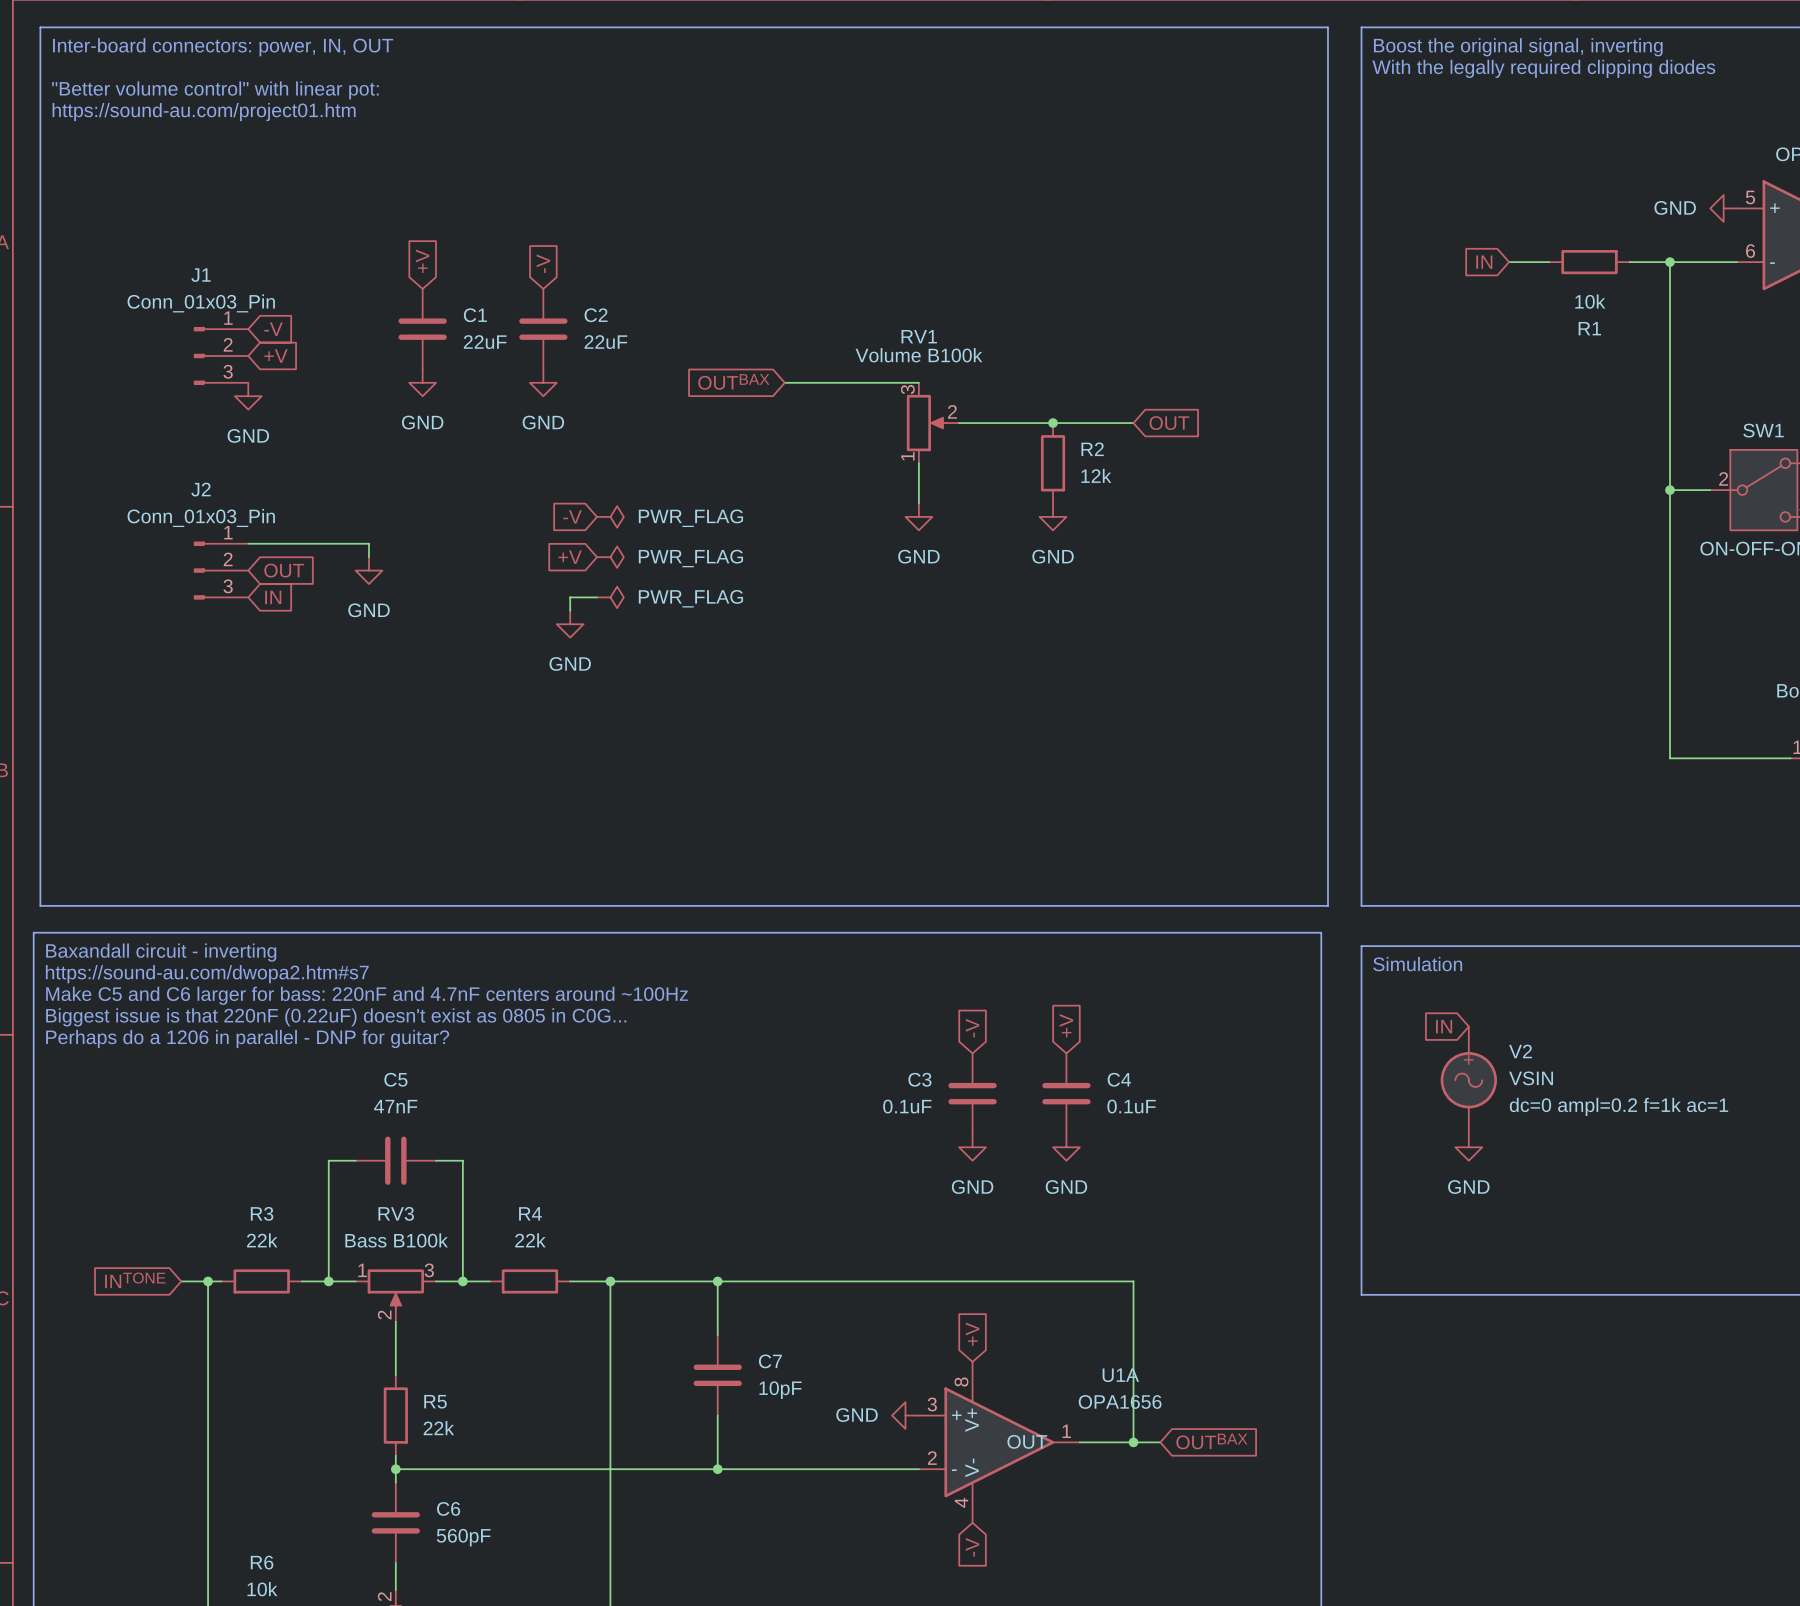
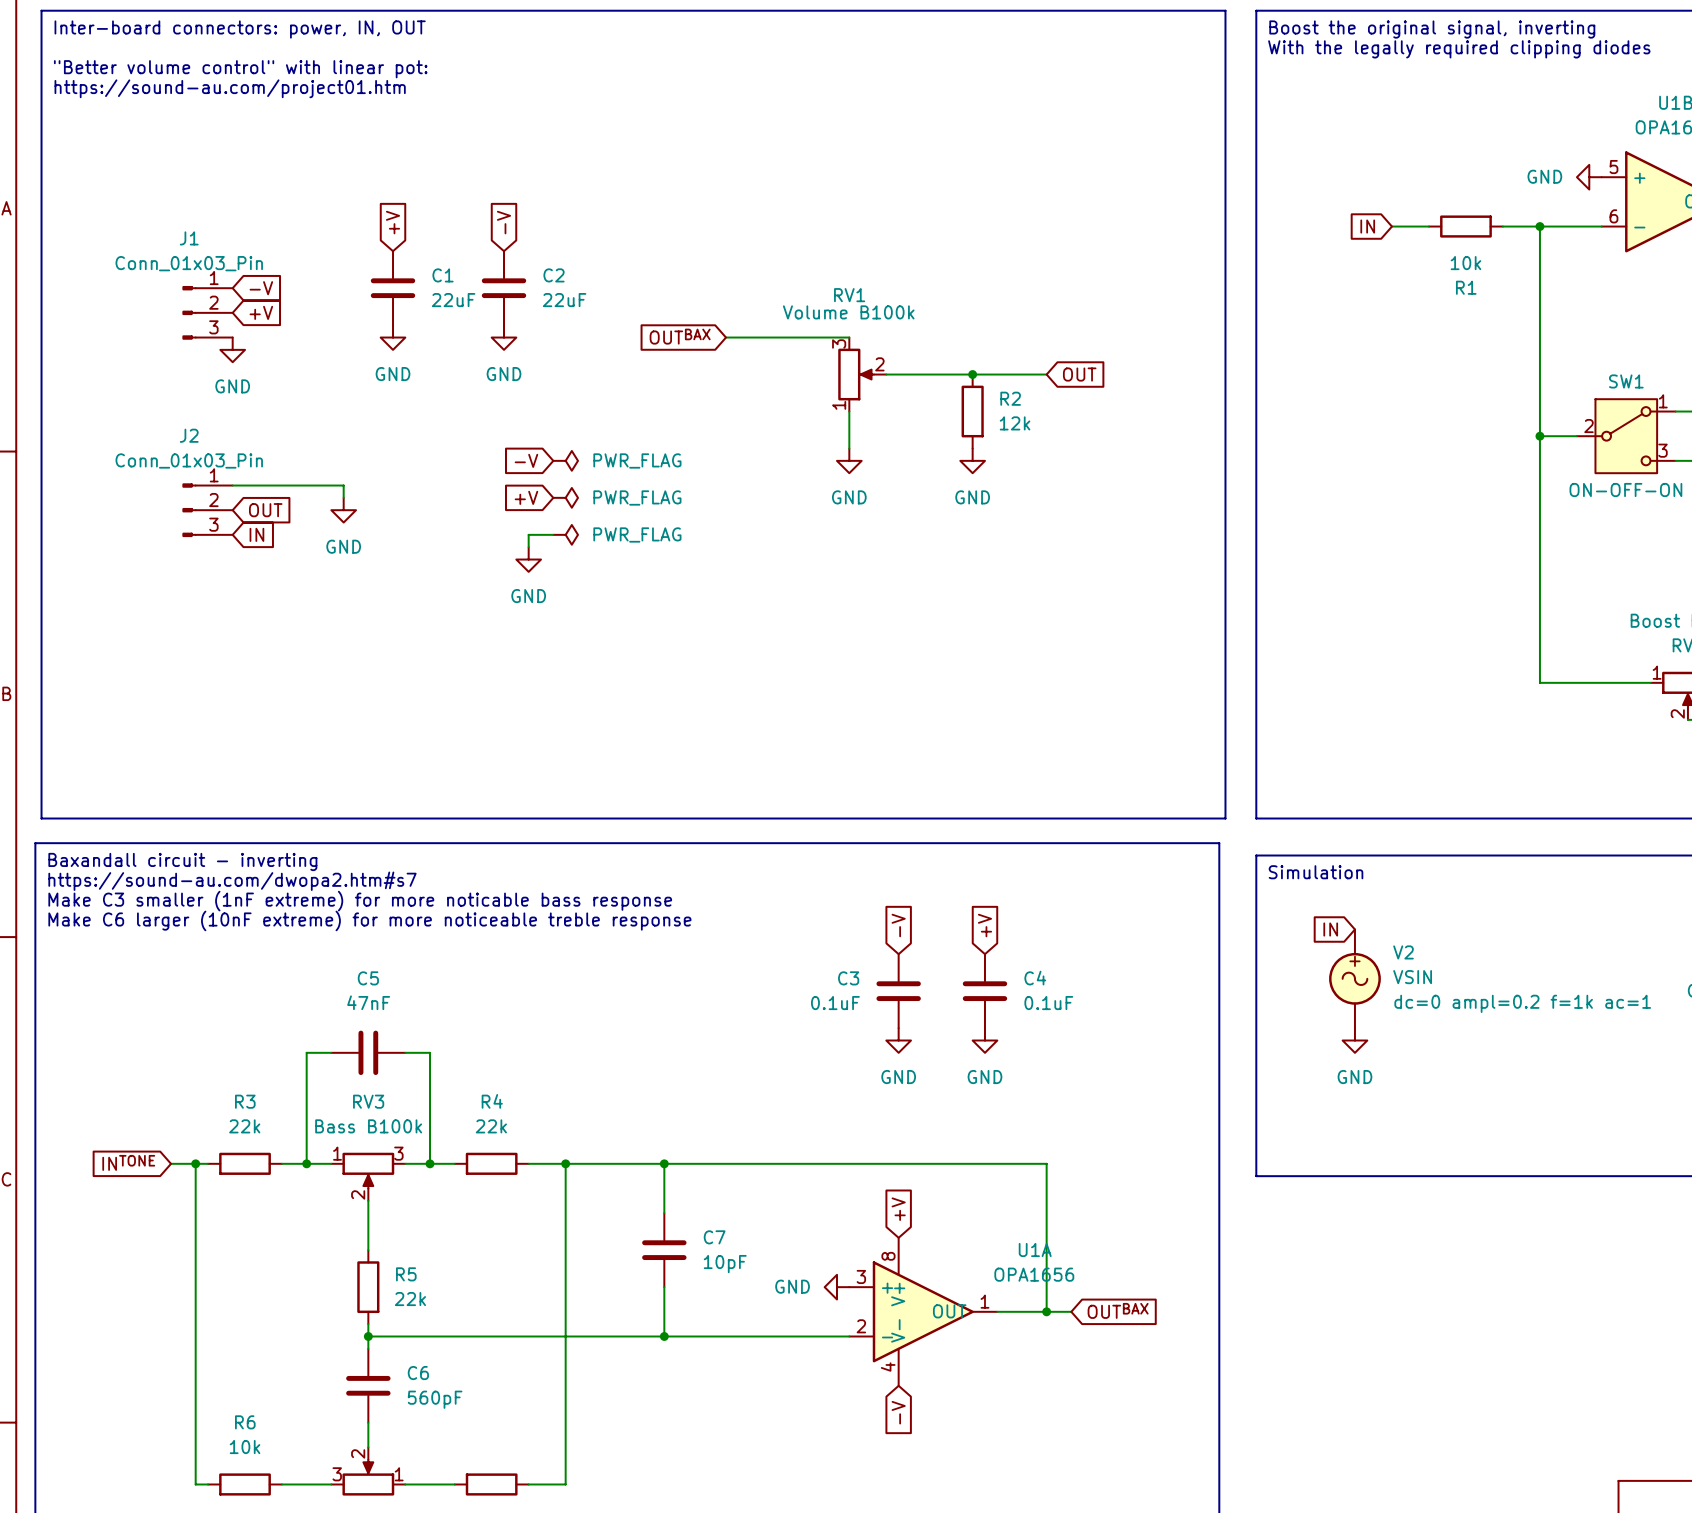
text: Make C5 and C6 larger for bass: 220nF and 4.7nF centers around ~100Hz (367, 995) -> Make C3 smaller (1nF extreme) for more noticable bass response (360, 901)
text: Biggest issue is that 220nF (0.22uF) doesn't exist as 0805 in C0G... (336, 1017) -> Make C6 larger (10nF extreme) for more noticeable treble response (369, 920)
text: Perhaps do a 1206 in parallel - DNP for guitar? (247, 1038) -> none

